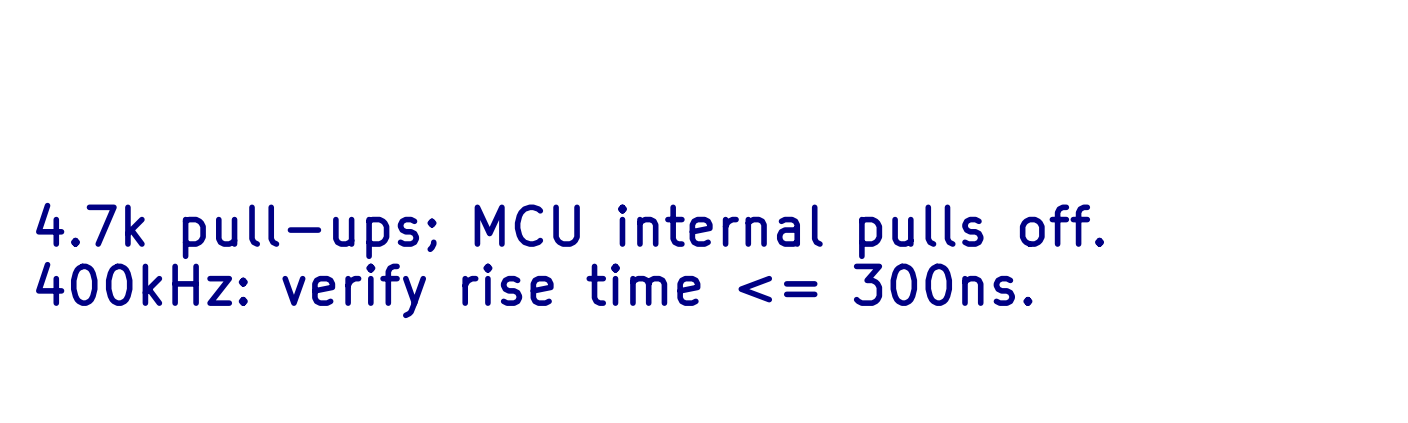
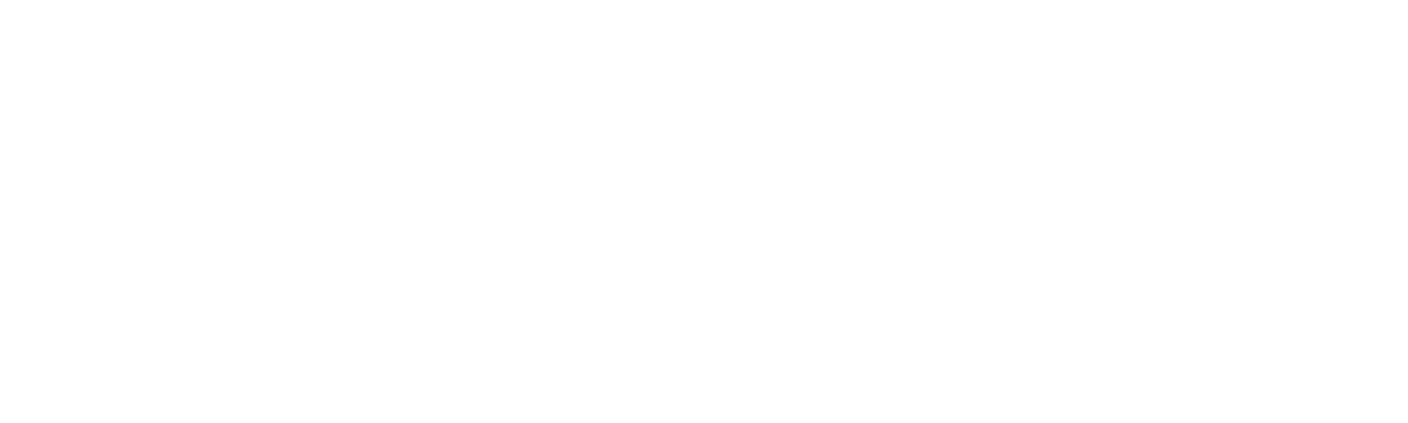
text: 4.7k pull-ups; MCU internal pulls off. (570, 230) -> none
text: 400kHz: verify rise time <= 300ns. (534, 290) -> none

